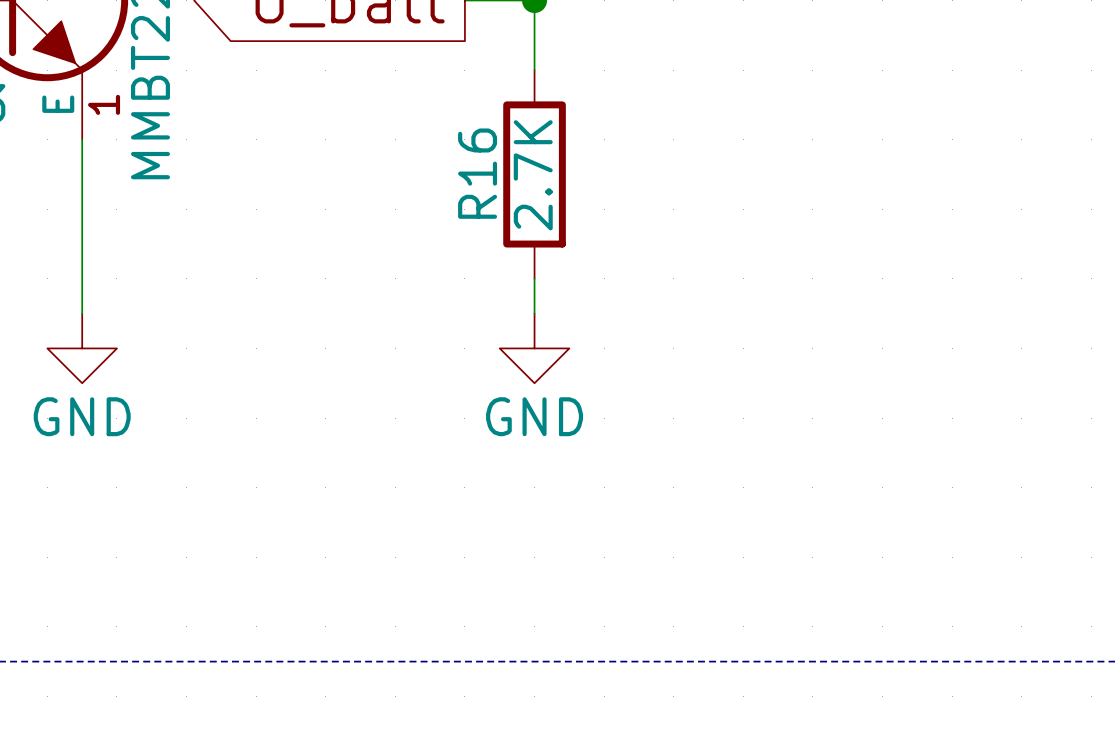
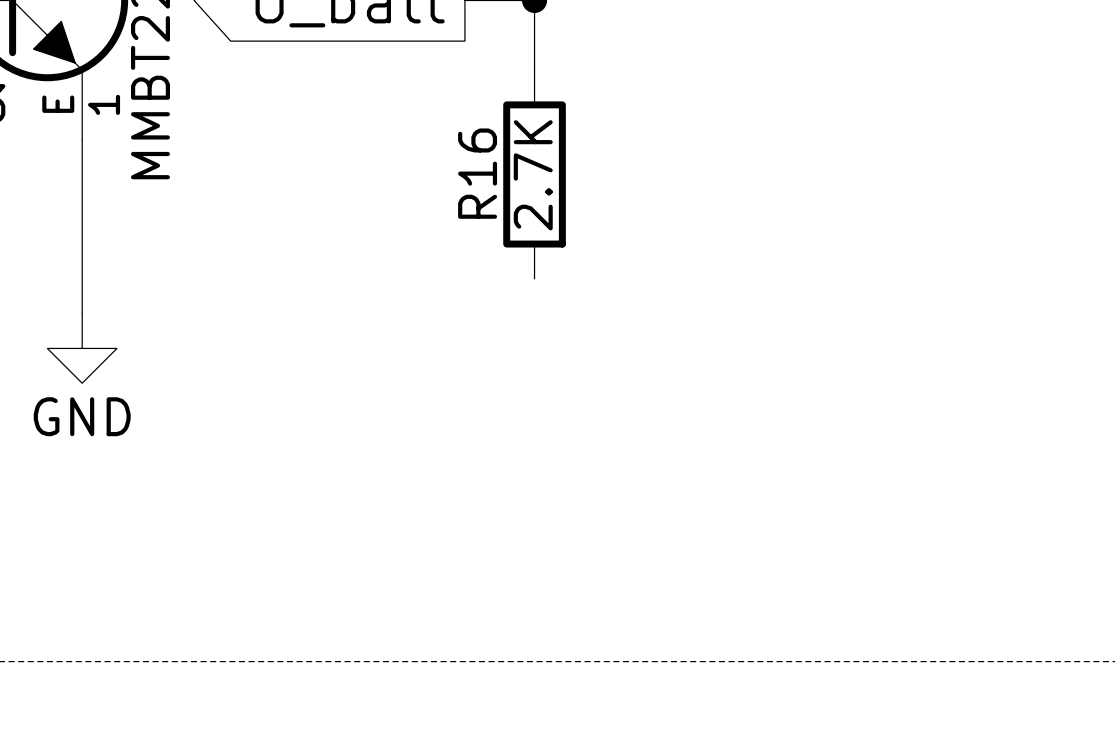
wire: (534, 278) (534, 313) -> none
power symbol: GND (534, 348) -> none

